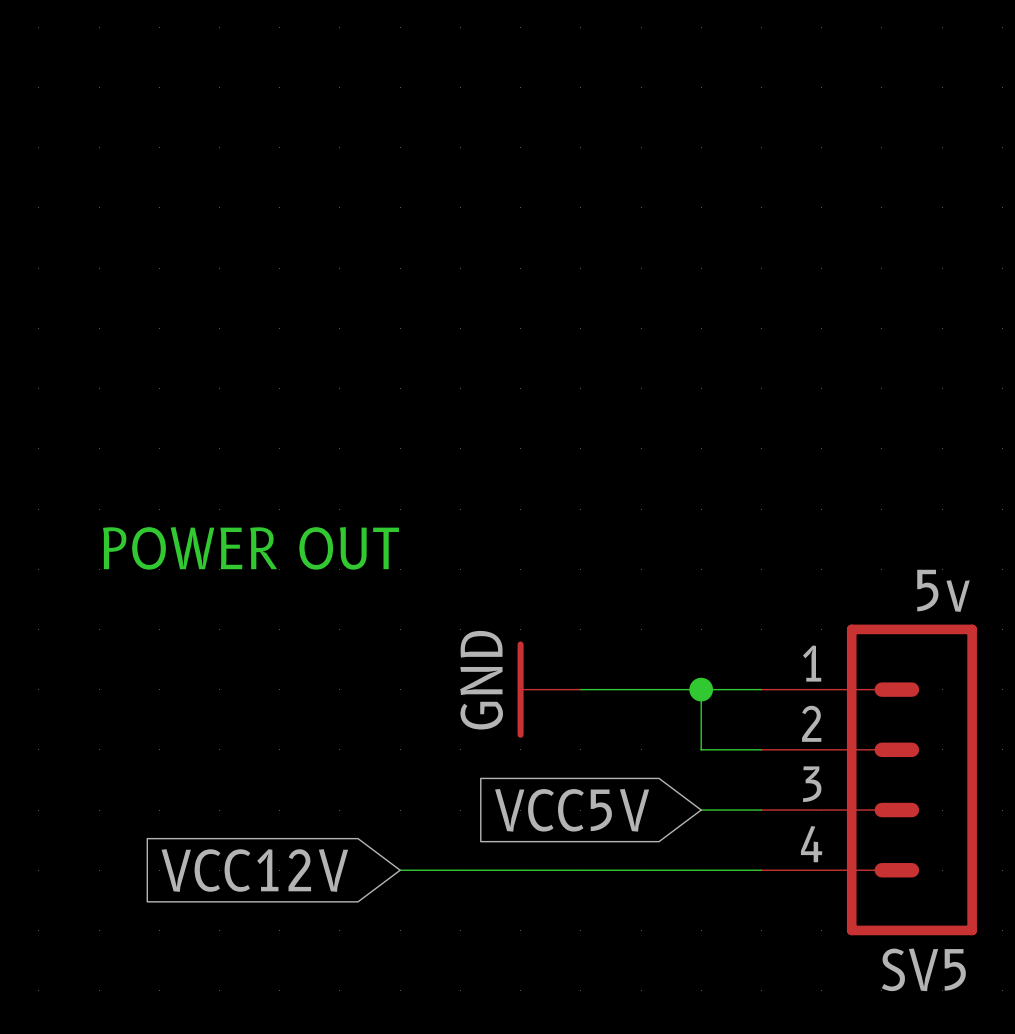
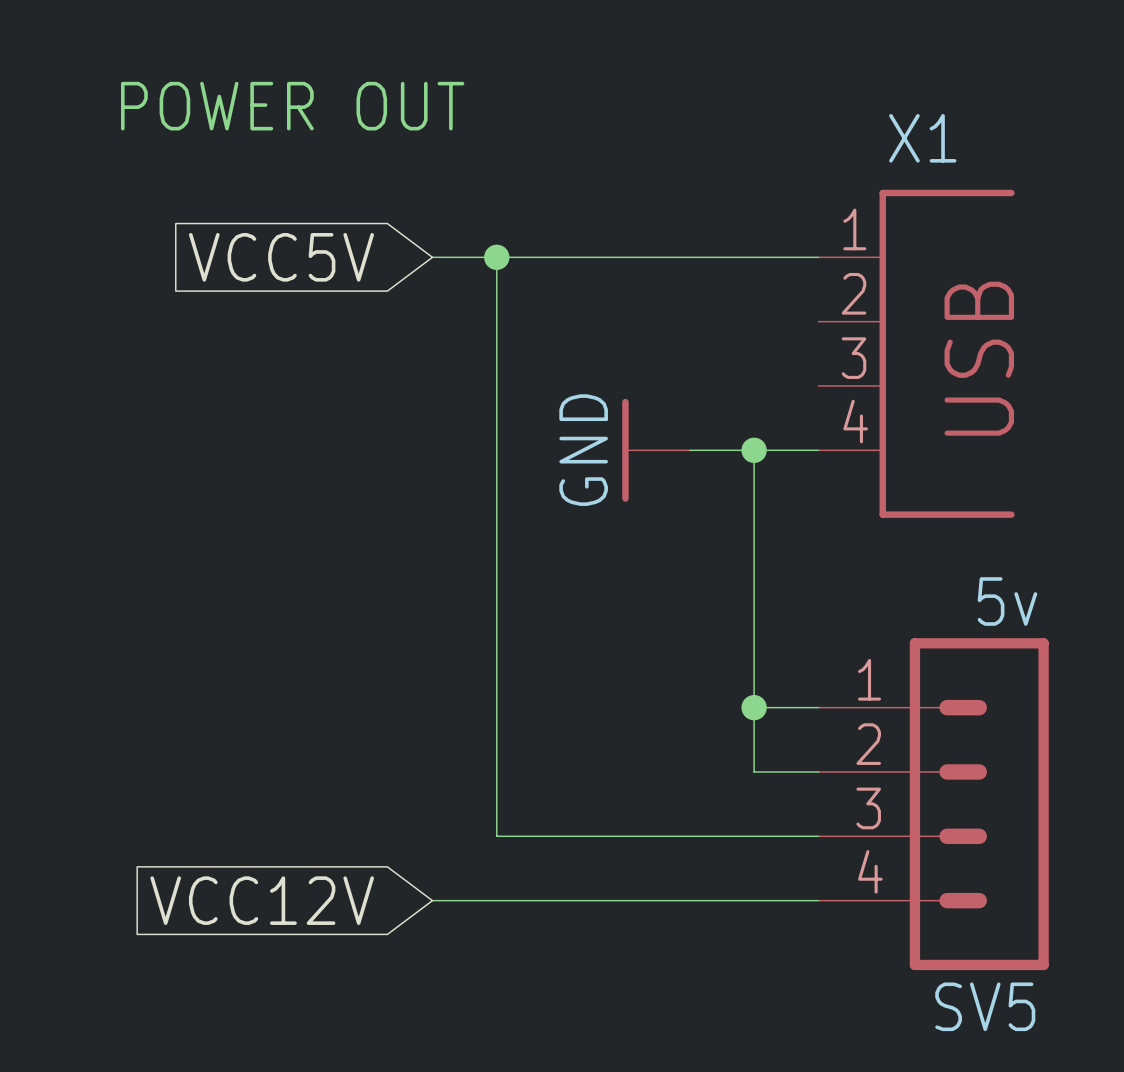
global label: none -> VCC5V (281, 257)
wire: none -> (432, 257) (818, 257)
wire: none -> (496, 257) (496, 836) (754, 836)
junction: none -> (496, 257)
X1: none -> (916, 353)
wire: none -> (689, 450) (818, 450)
junction: none -> (754, 450)
text position: POWER OUT (250, 548) -> POWER OUT (292, 106)
power symbol position: GND (549, 689) -> GND (656, 450)
wire: (580, 689) (701, 689) -> (754, 450) (754, 707)
global label: VCC5V (572, 810) -> none

